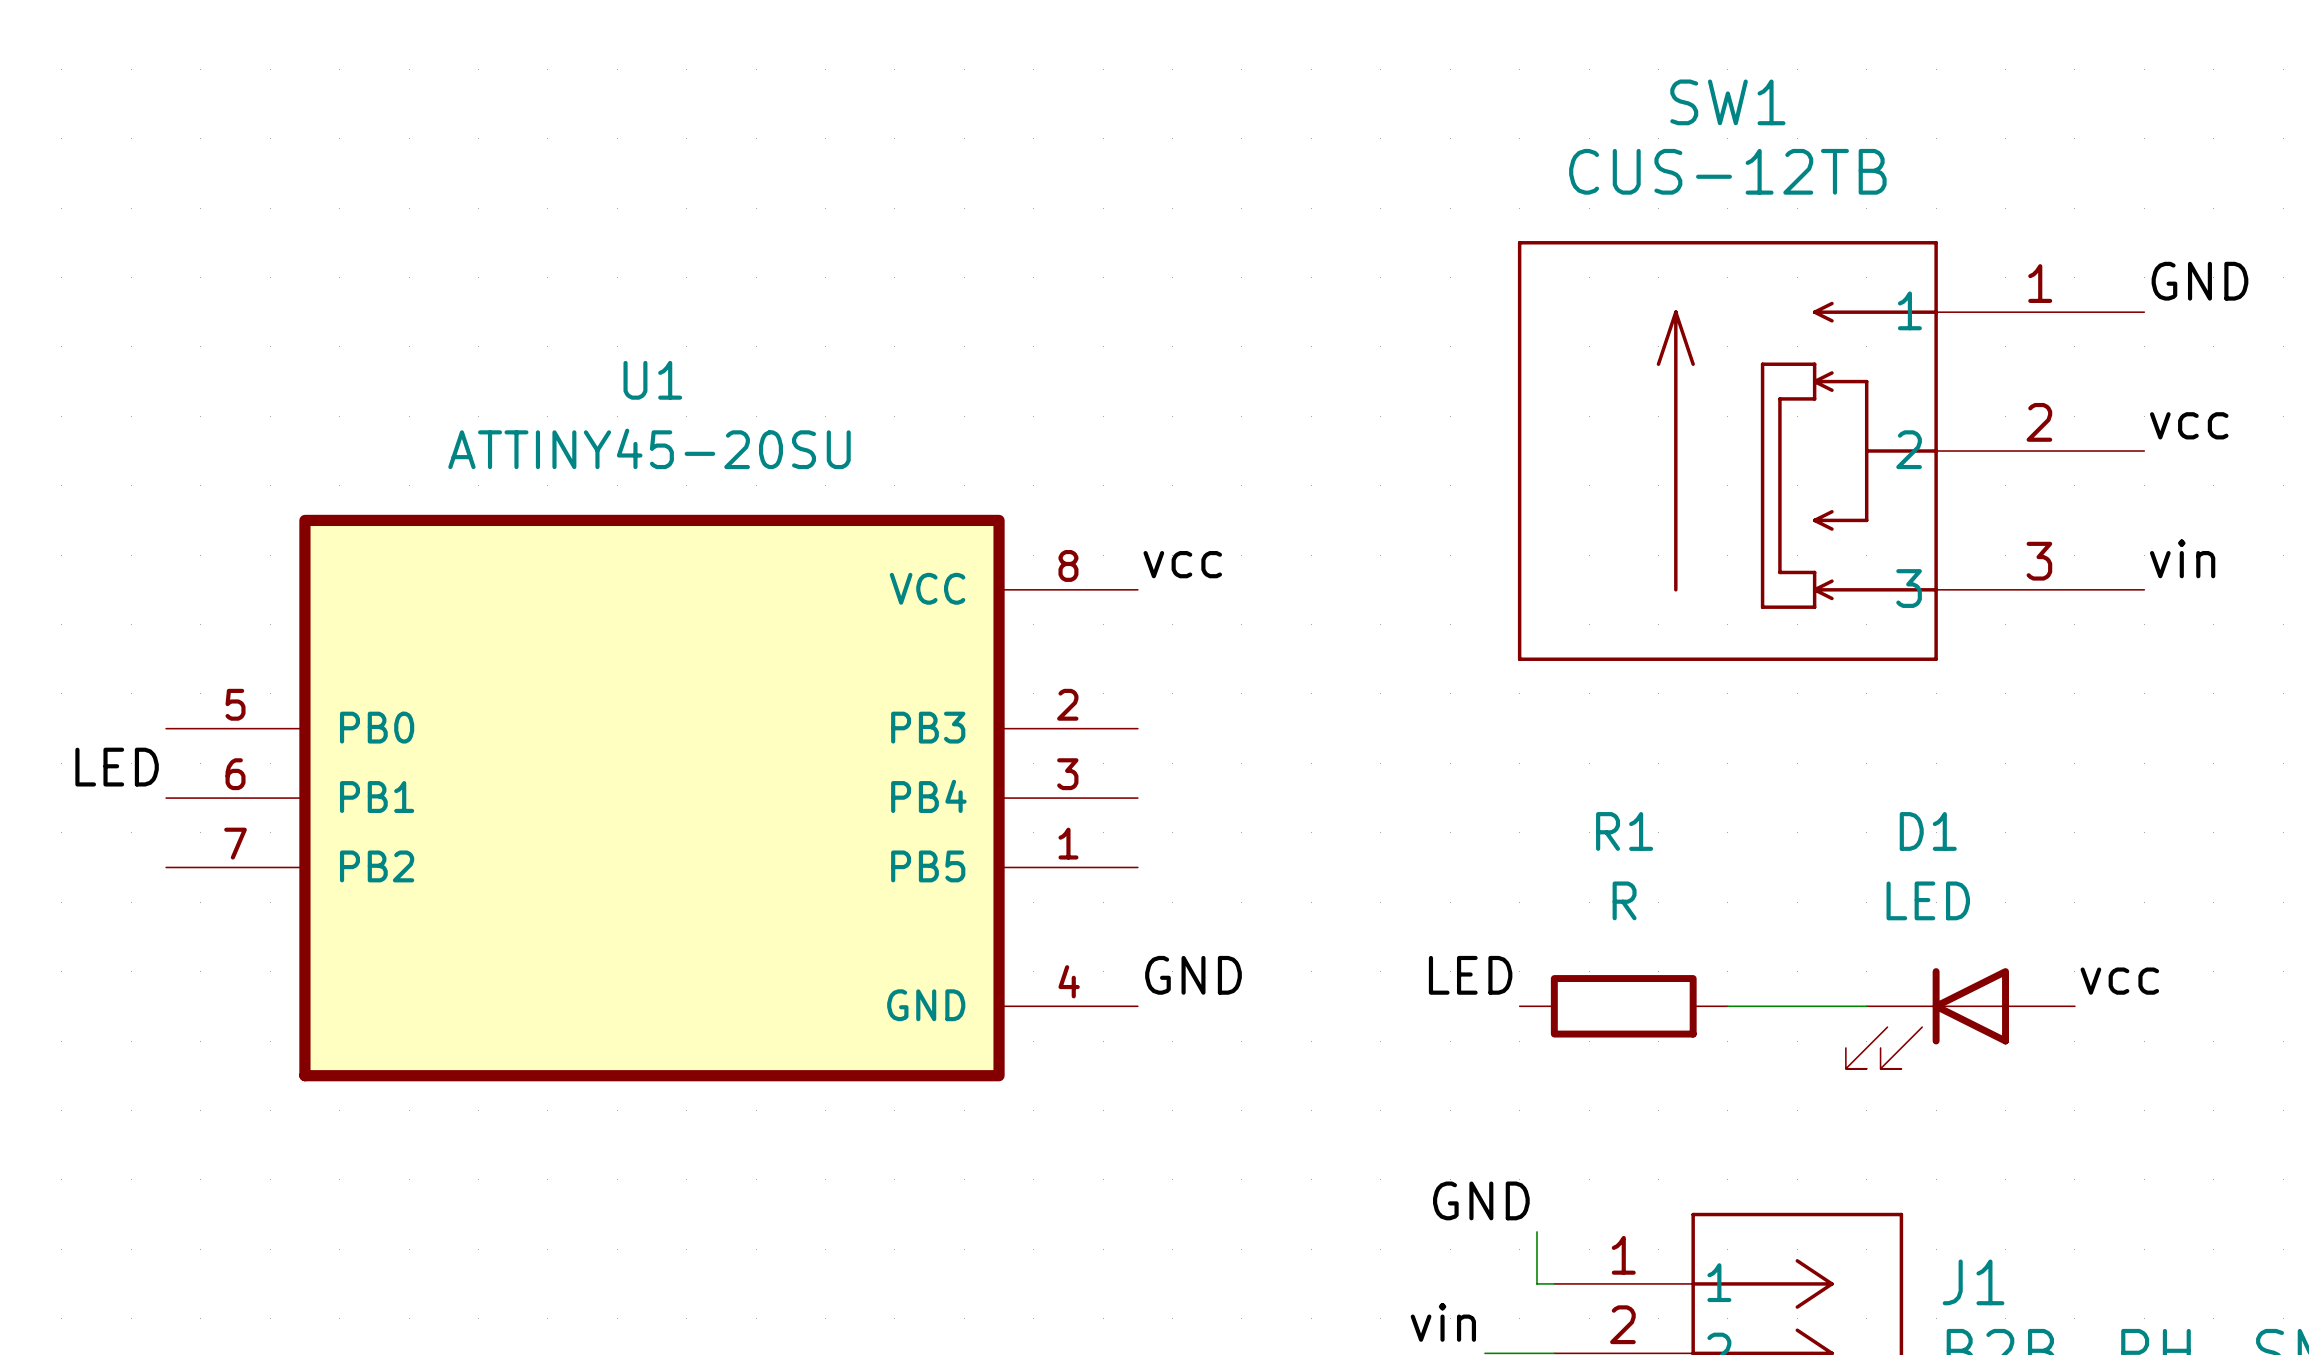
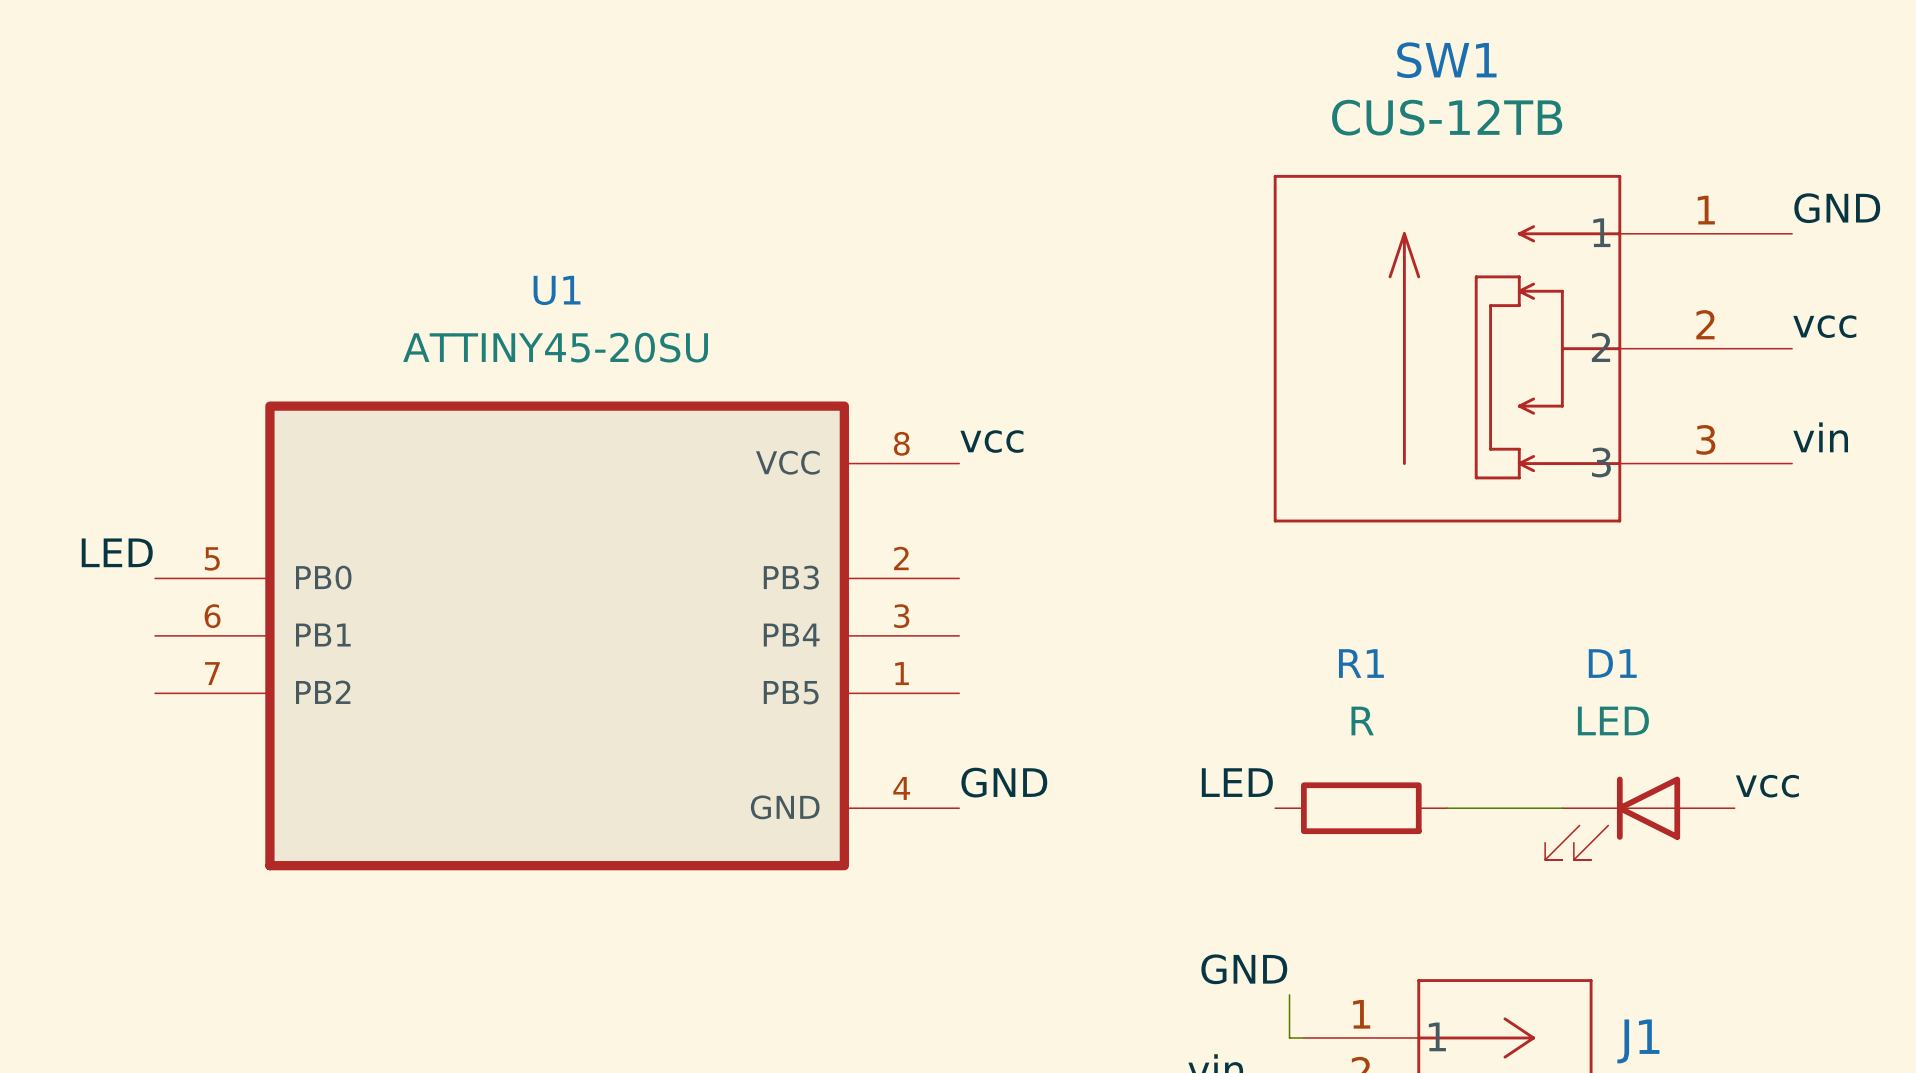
label position: LED (117, 767) -> LED (117, 552)

